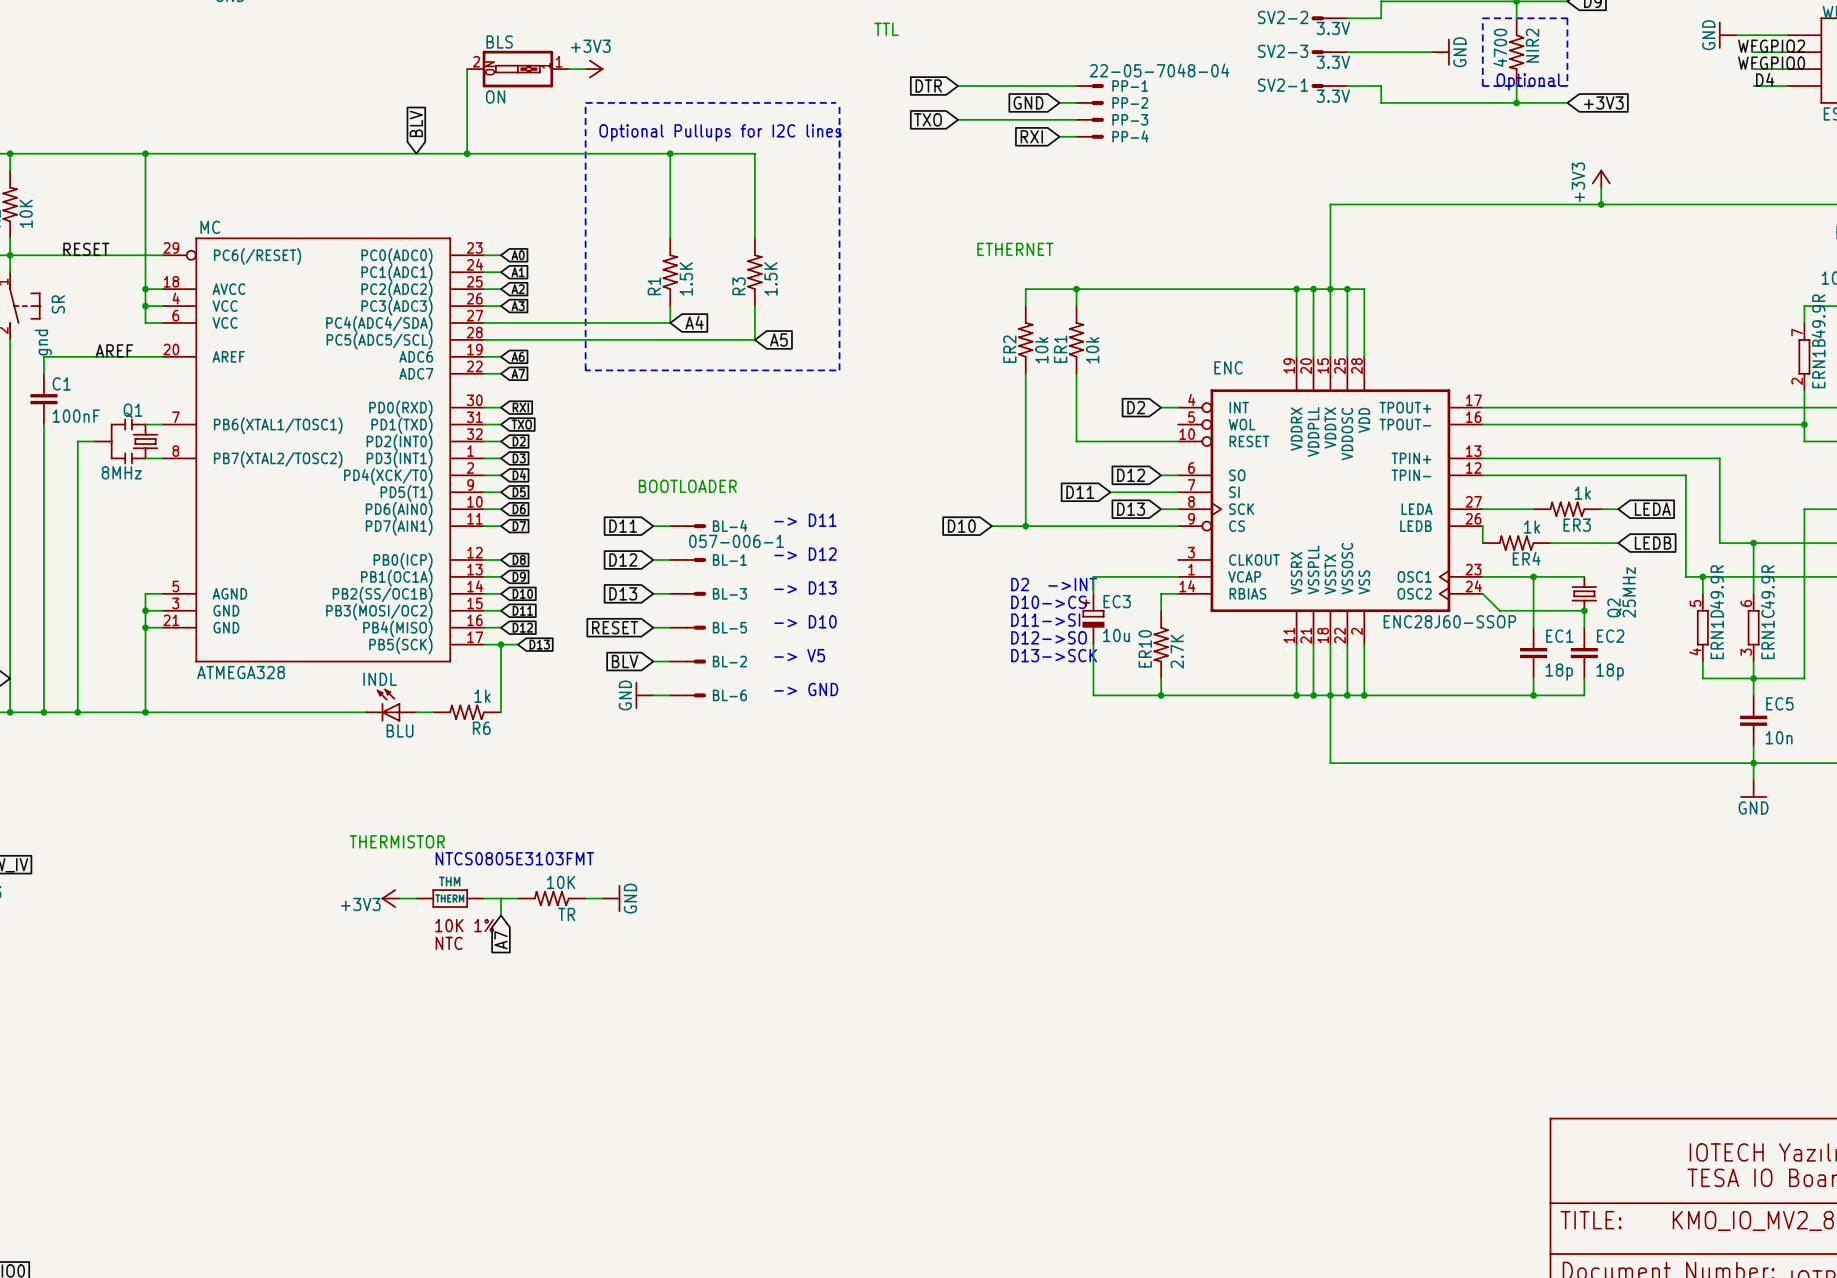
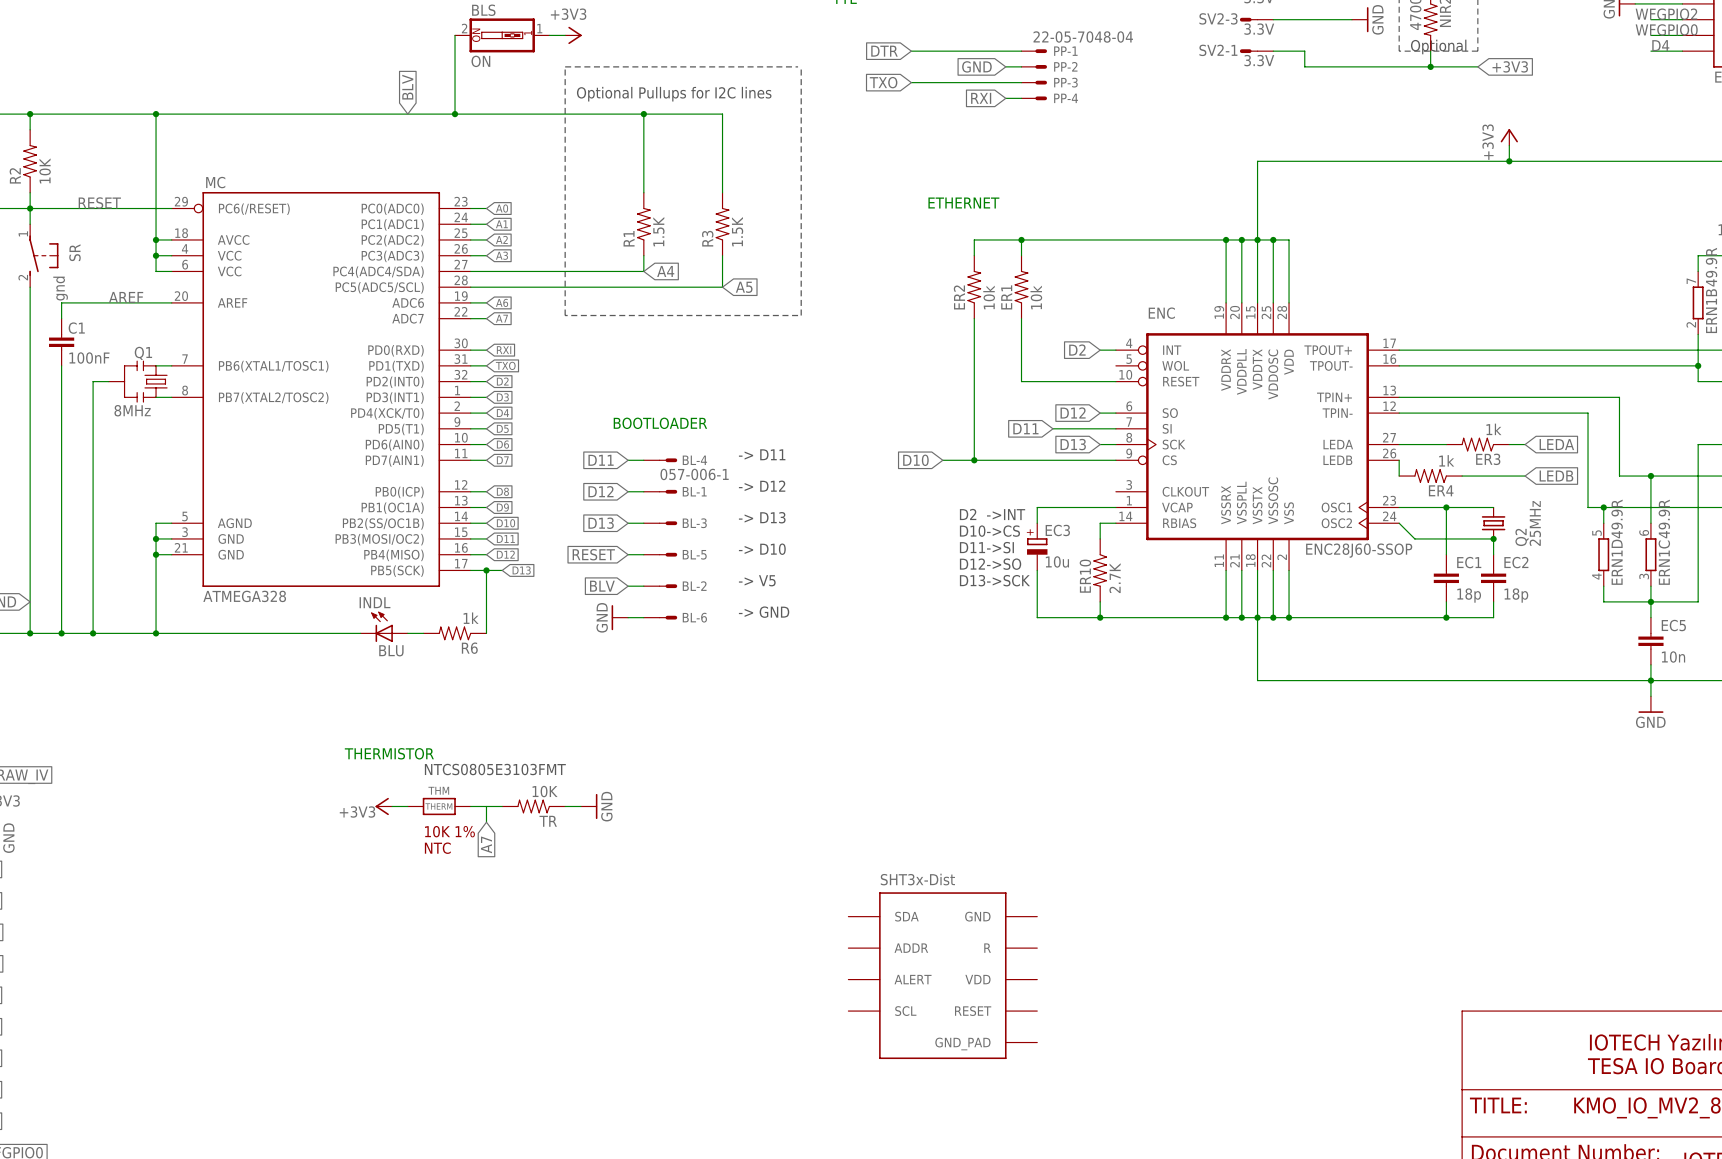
part: none -> (942, 975)

